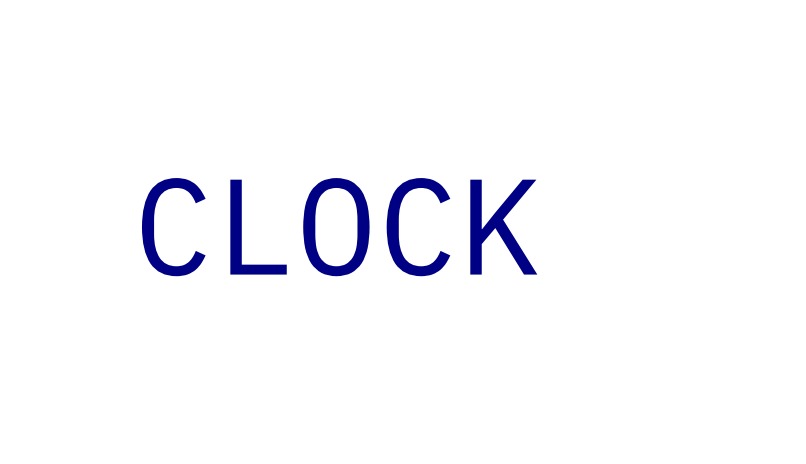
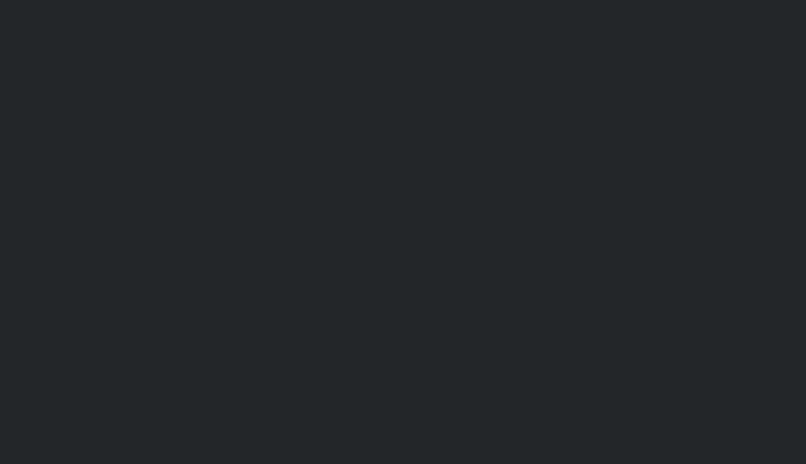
text: CLOCK (339, 227) -> none

